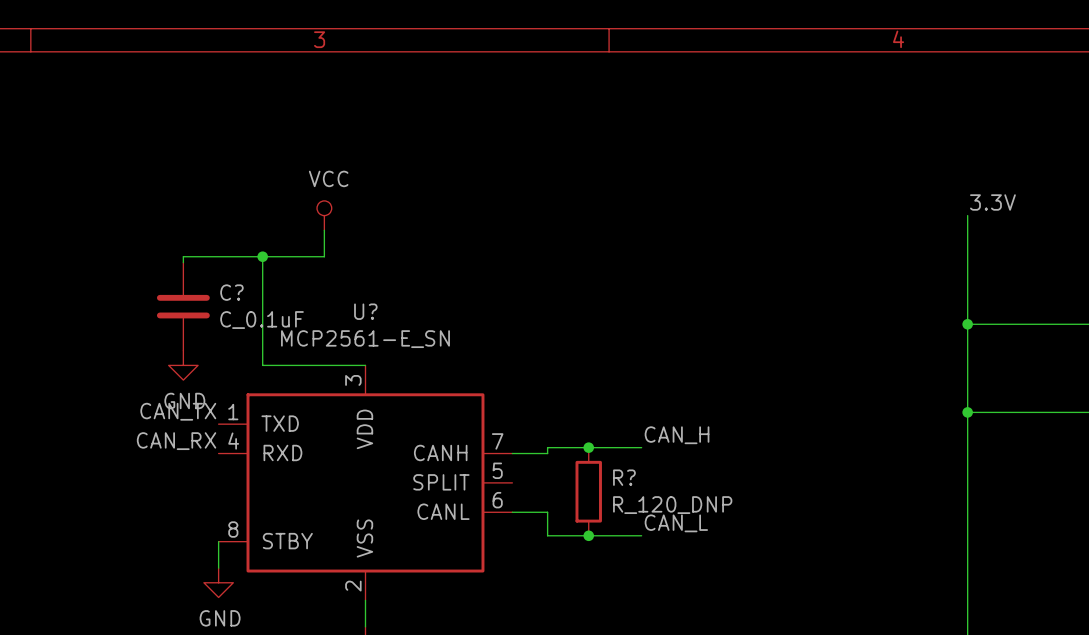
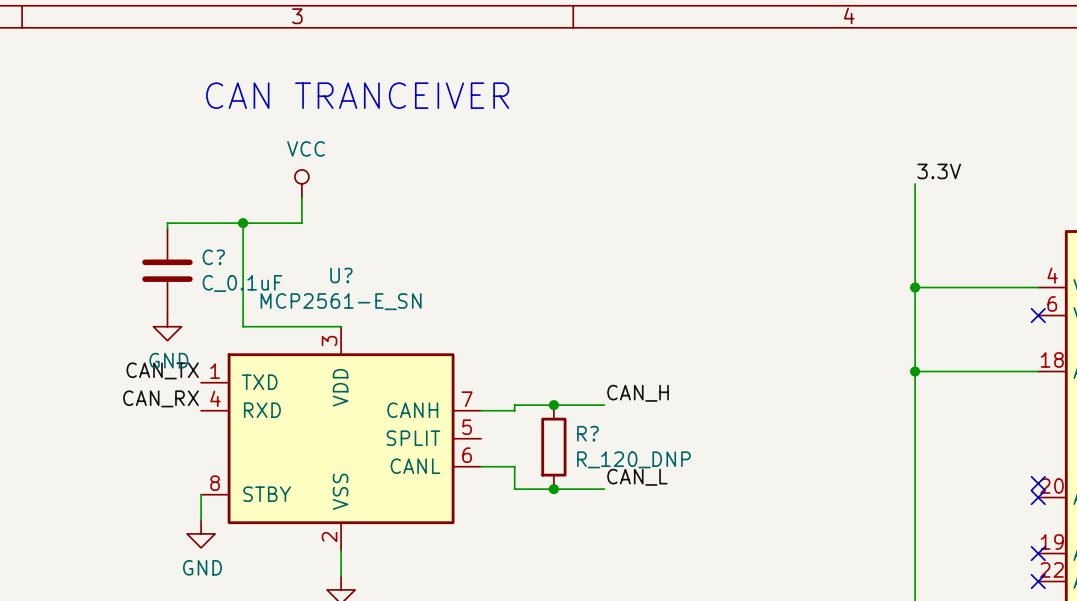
text: none -> CAN TRANCEIVER (357, 95)

